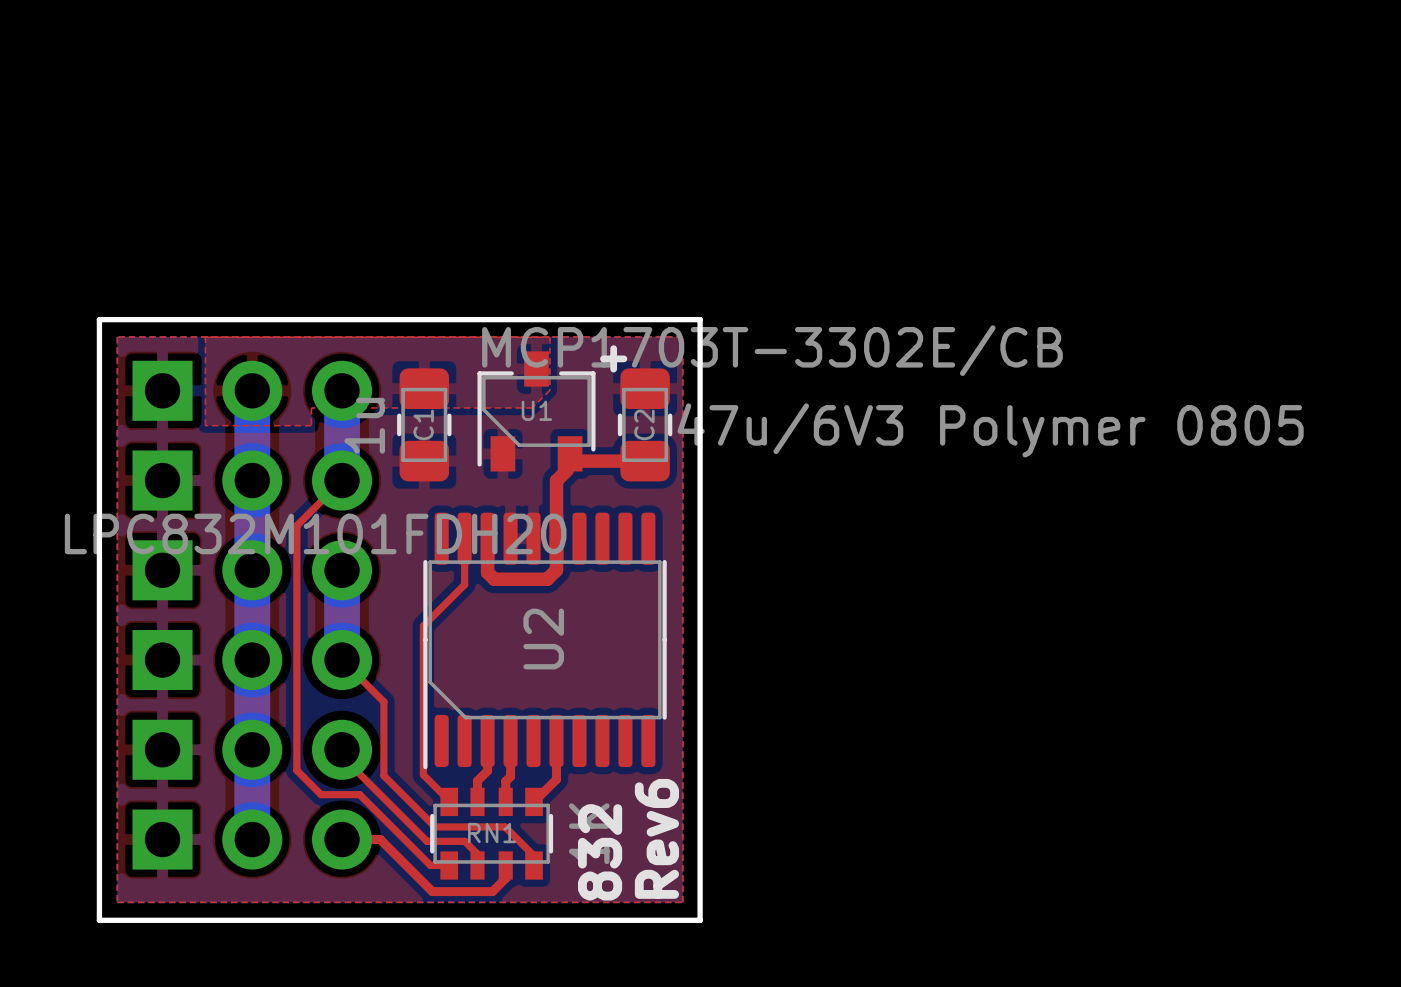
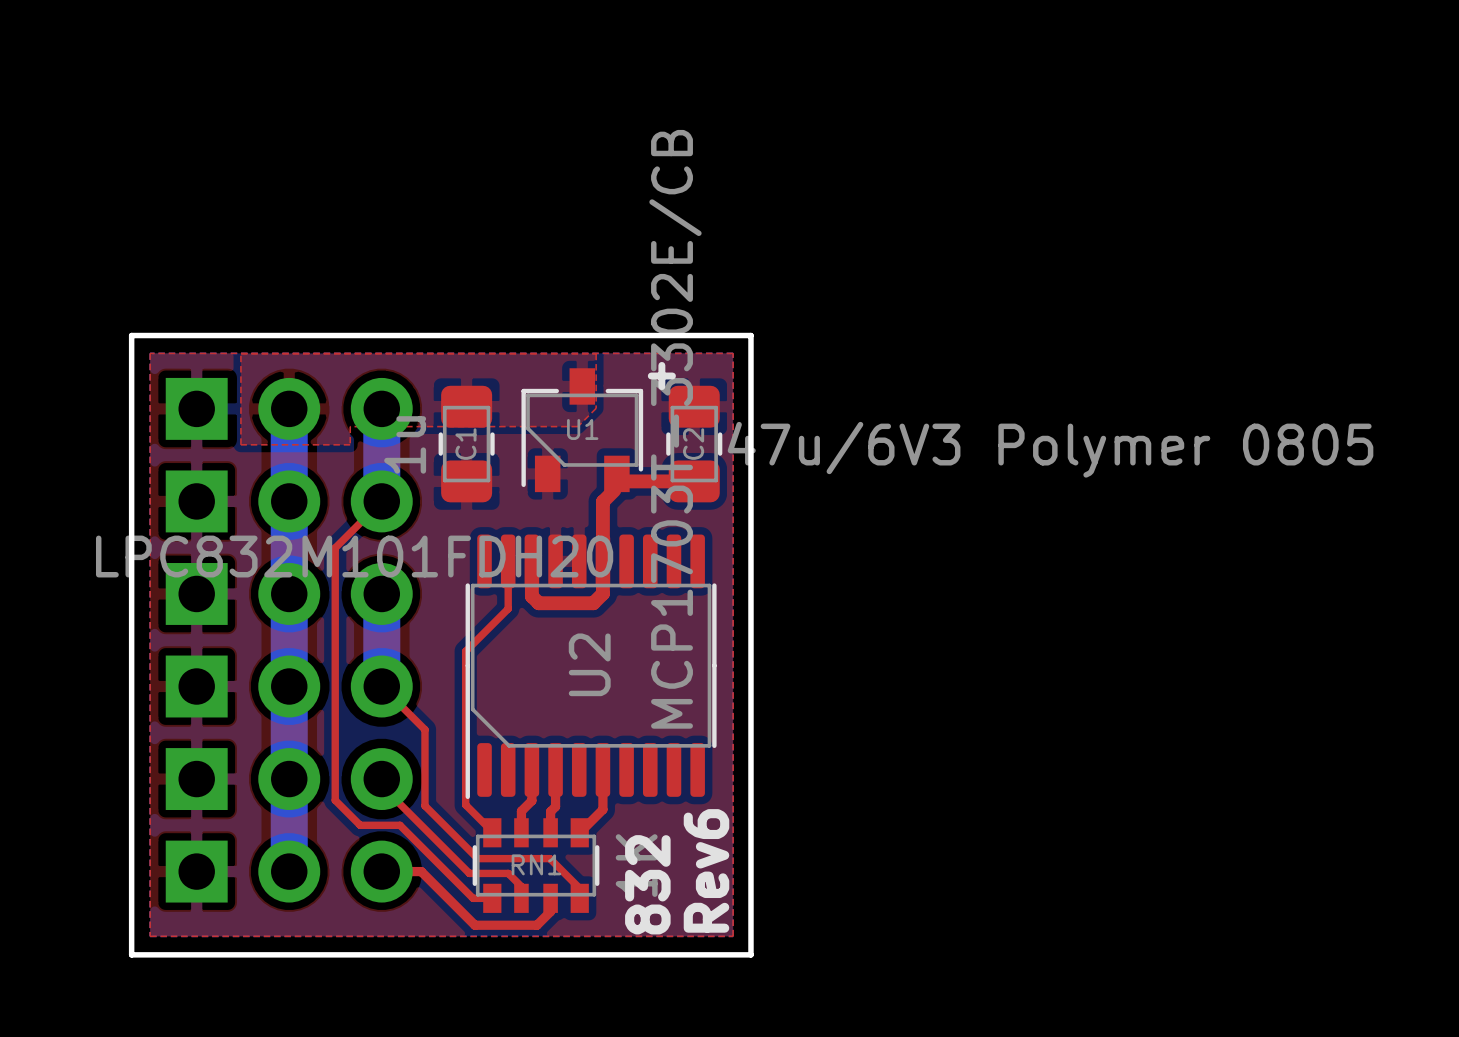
U1 value rotation: 0° (772, 350) -> 90° counterclockwise (675, 429)

